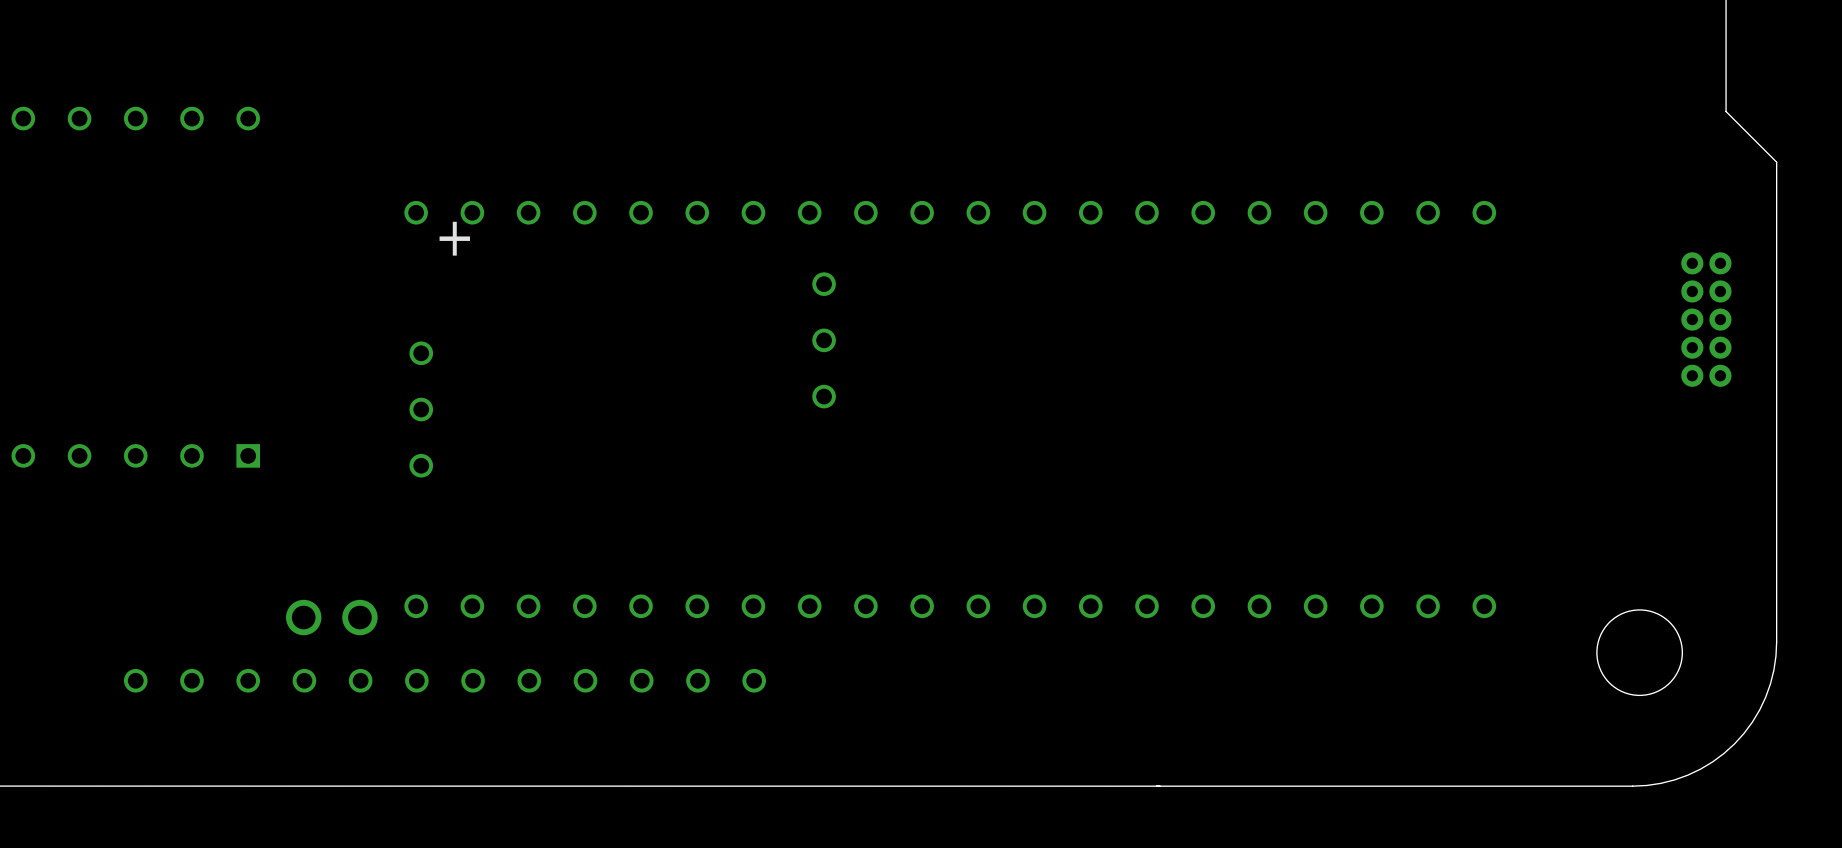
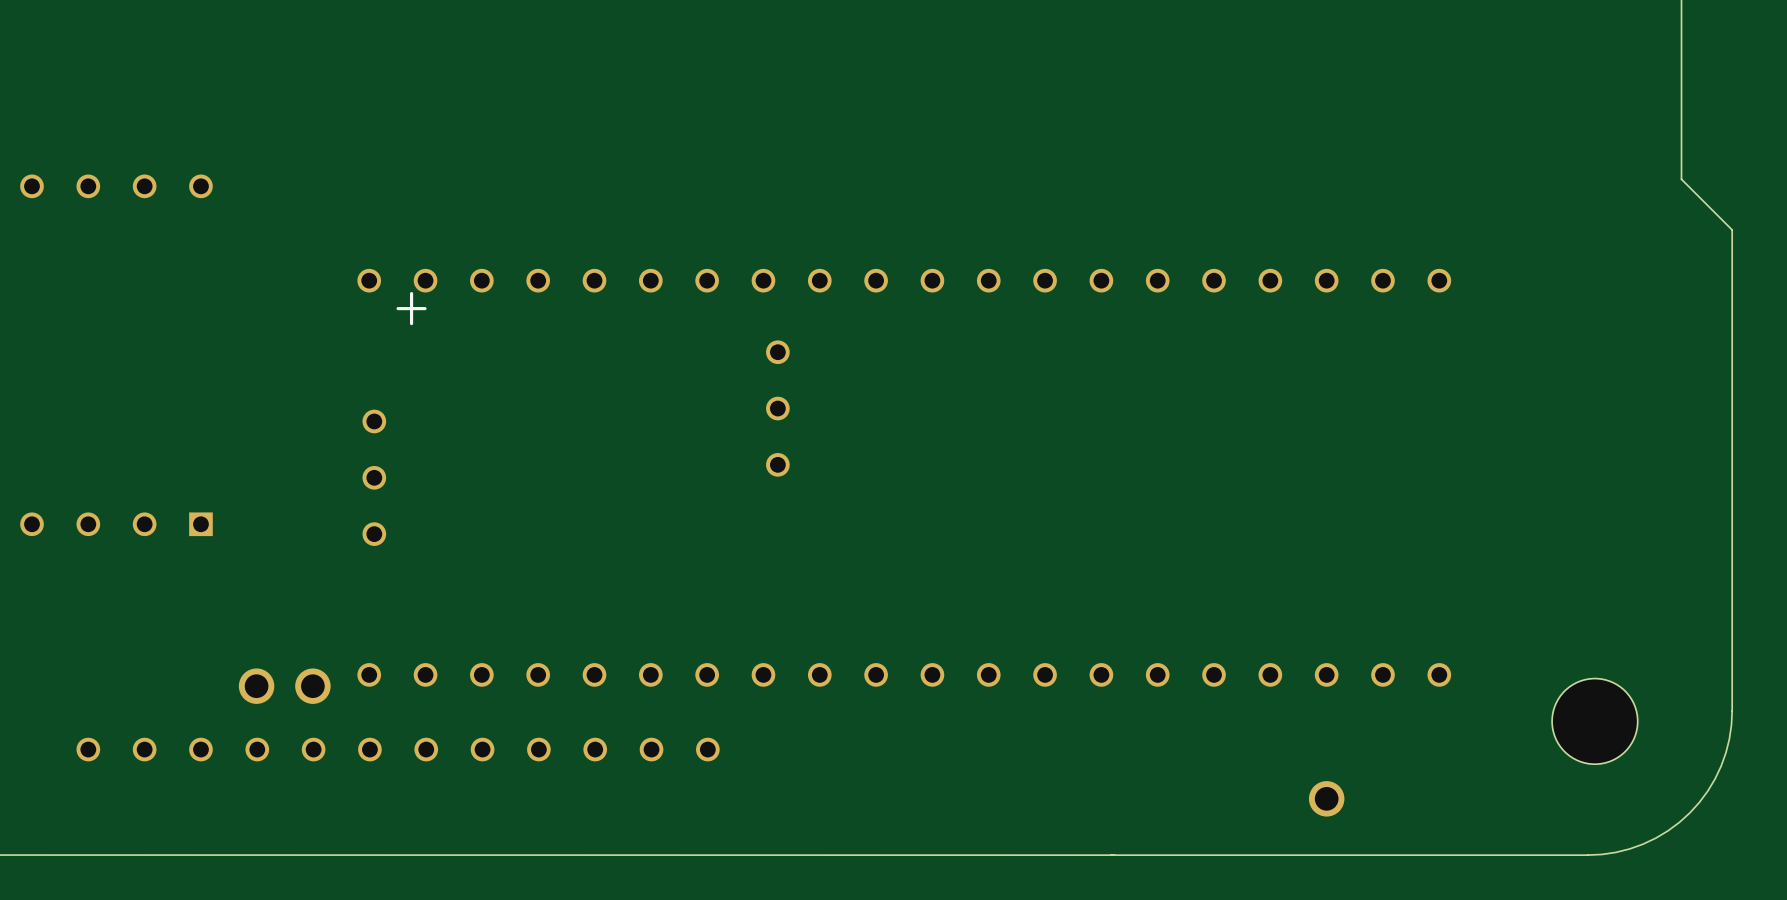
part: (1706, 319) -> none
part: none -> (1326, 798)

